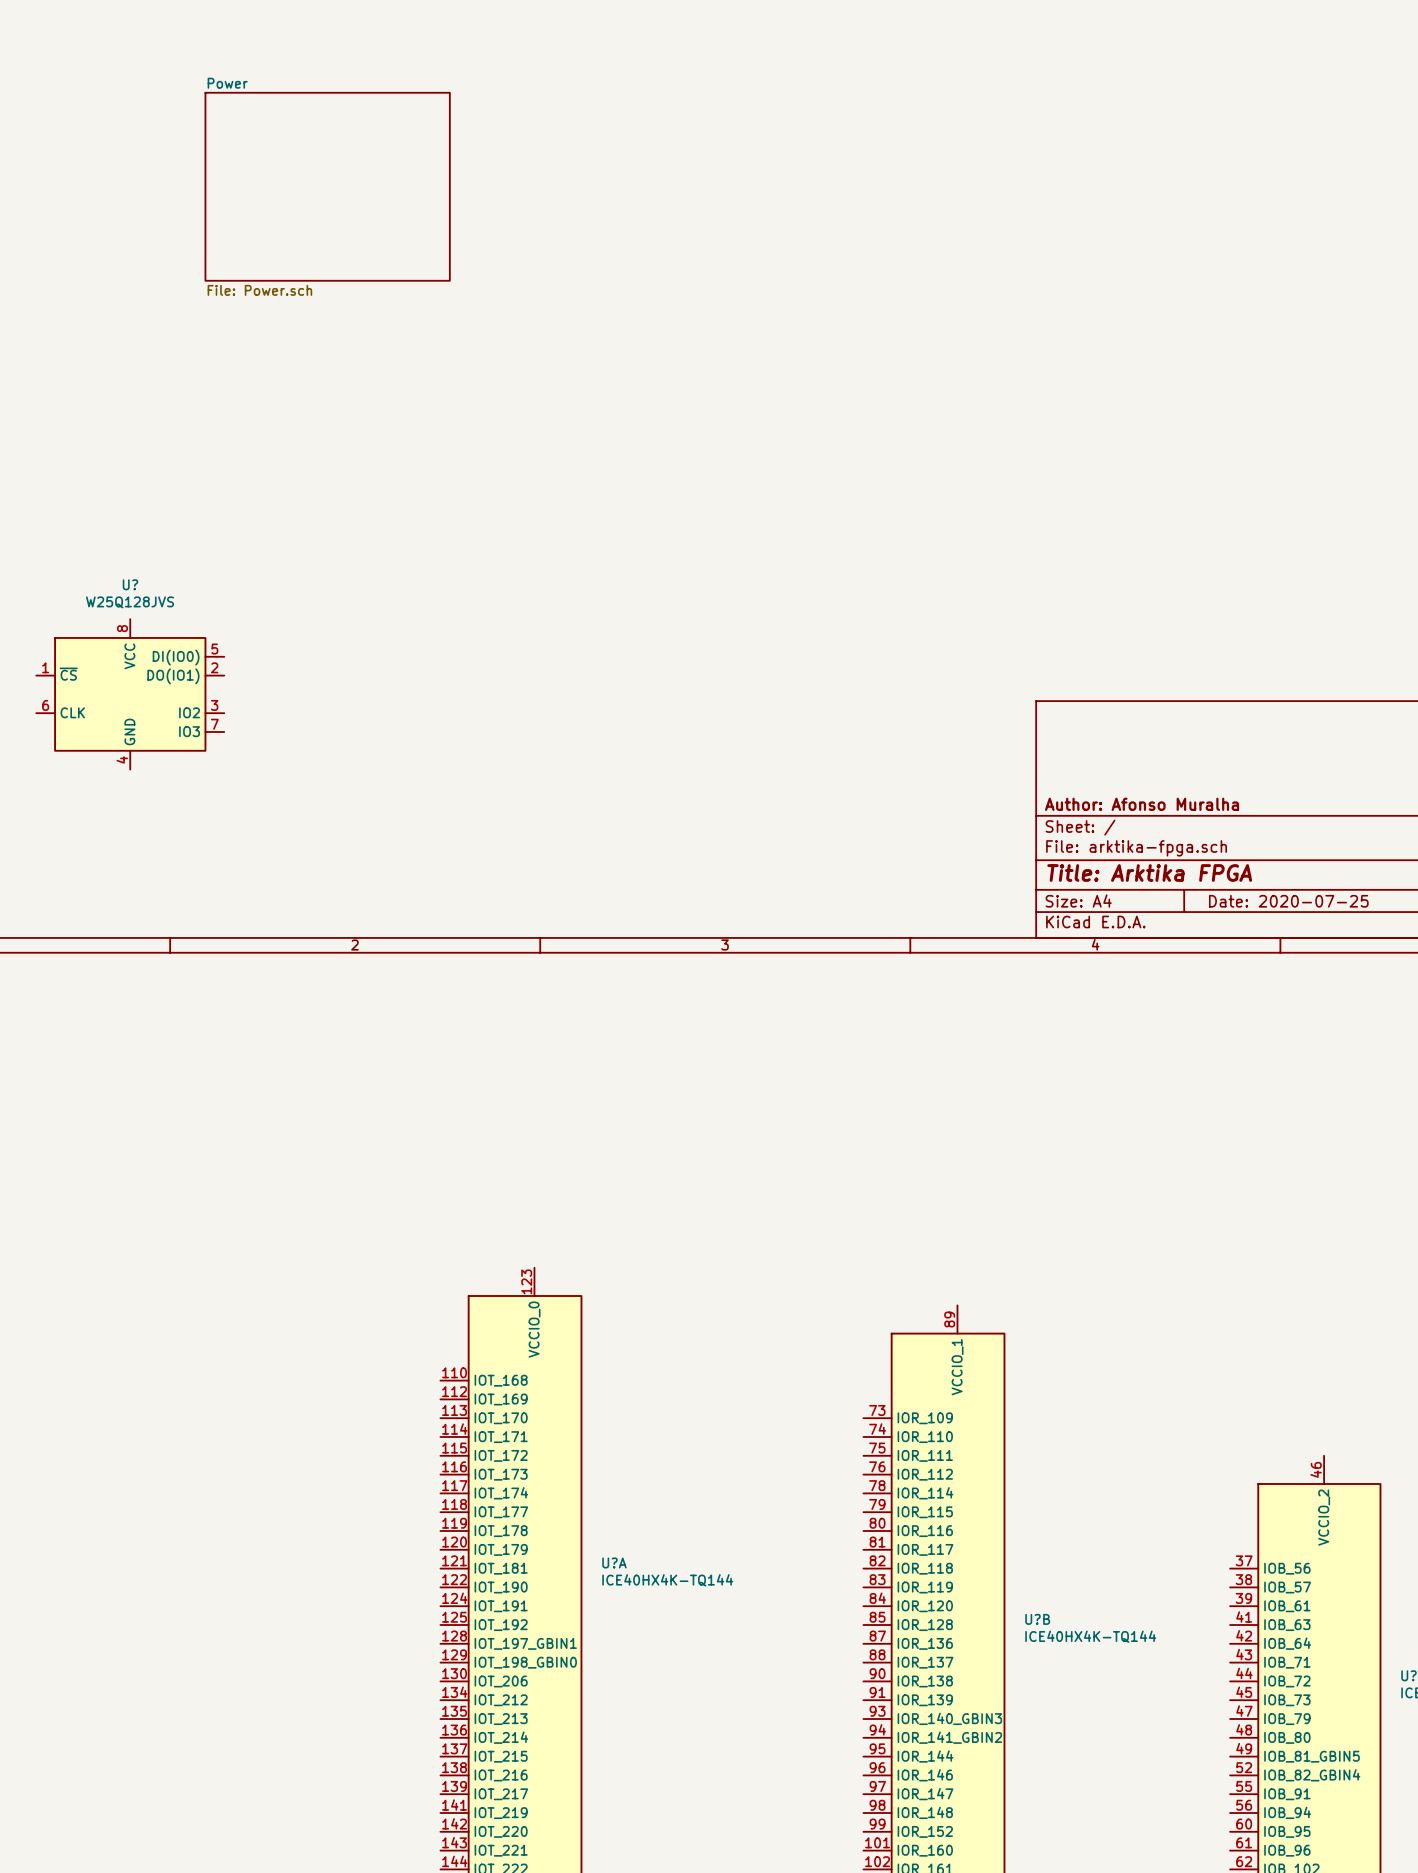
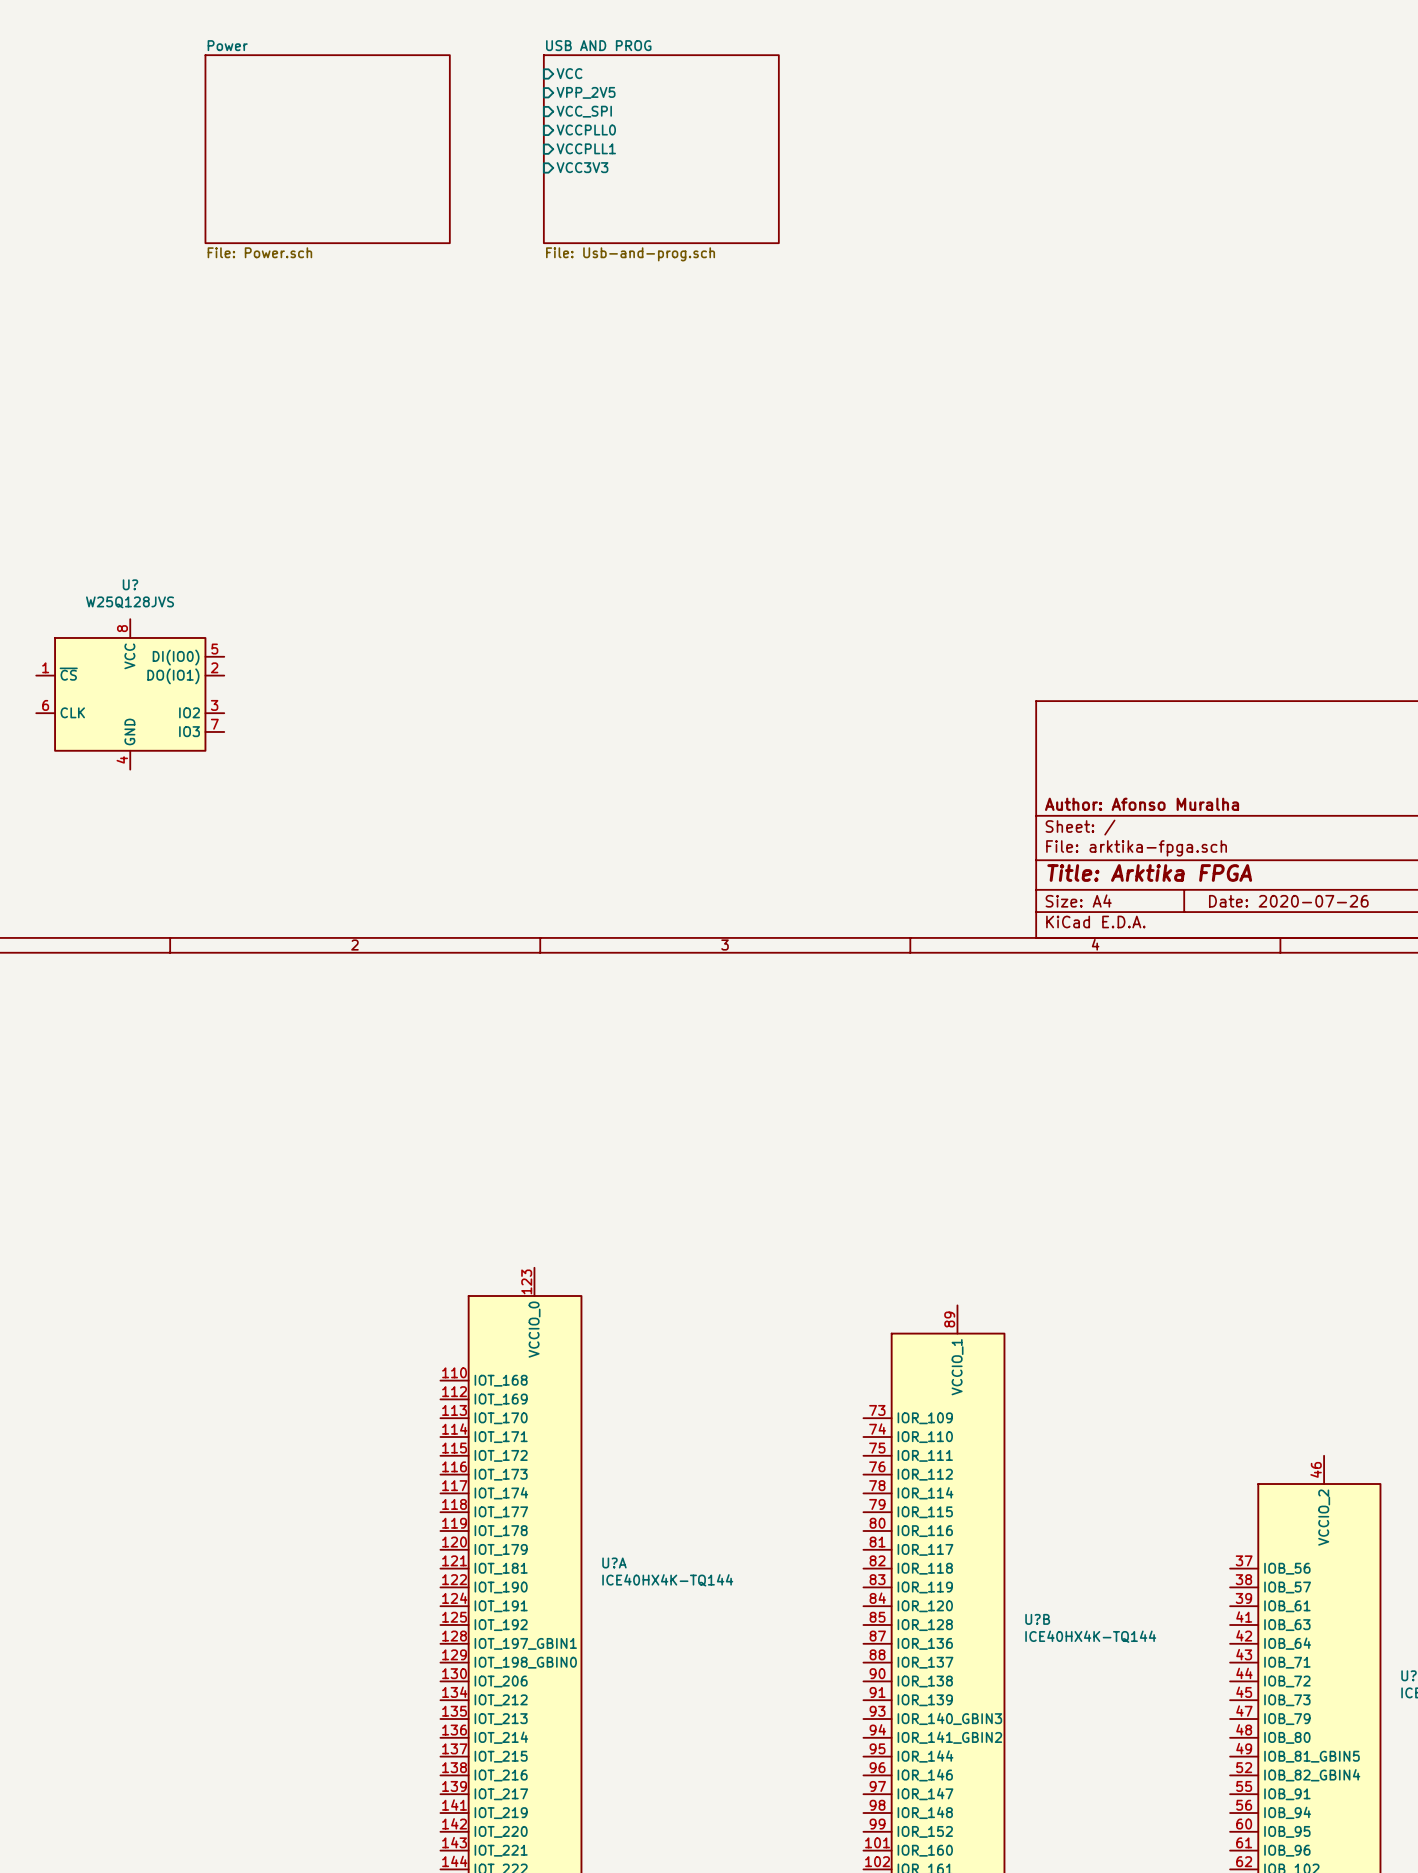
sheet pin: none -> VCC (569, 73)
sheet pin: none -> VPP_2V5 (586, 92)
sheet pin: none -> VCC_SPI (584, 111)
sheet pin: none -> VCCPLL0 (586, 130)
sheet pin: none -> VCCPLL1 (586, 148)
sheet USB AND PROG: none -> File: Usb-and-prog.sch (661, 149)
sheet pin: none -> VCC3V3 (582, 167)
sheet Power position: (327, 186) -> (327, 149)
title block: Date: 2020-07-25 (1288, 901) -> Date: 2020-07-26 (1288, 901)

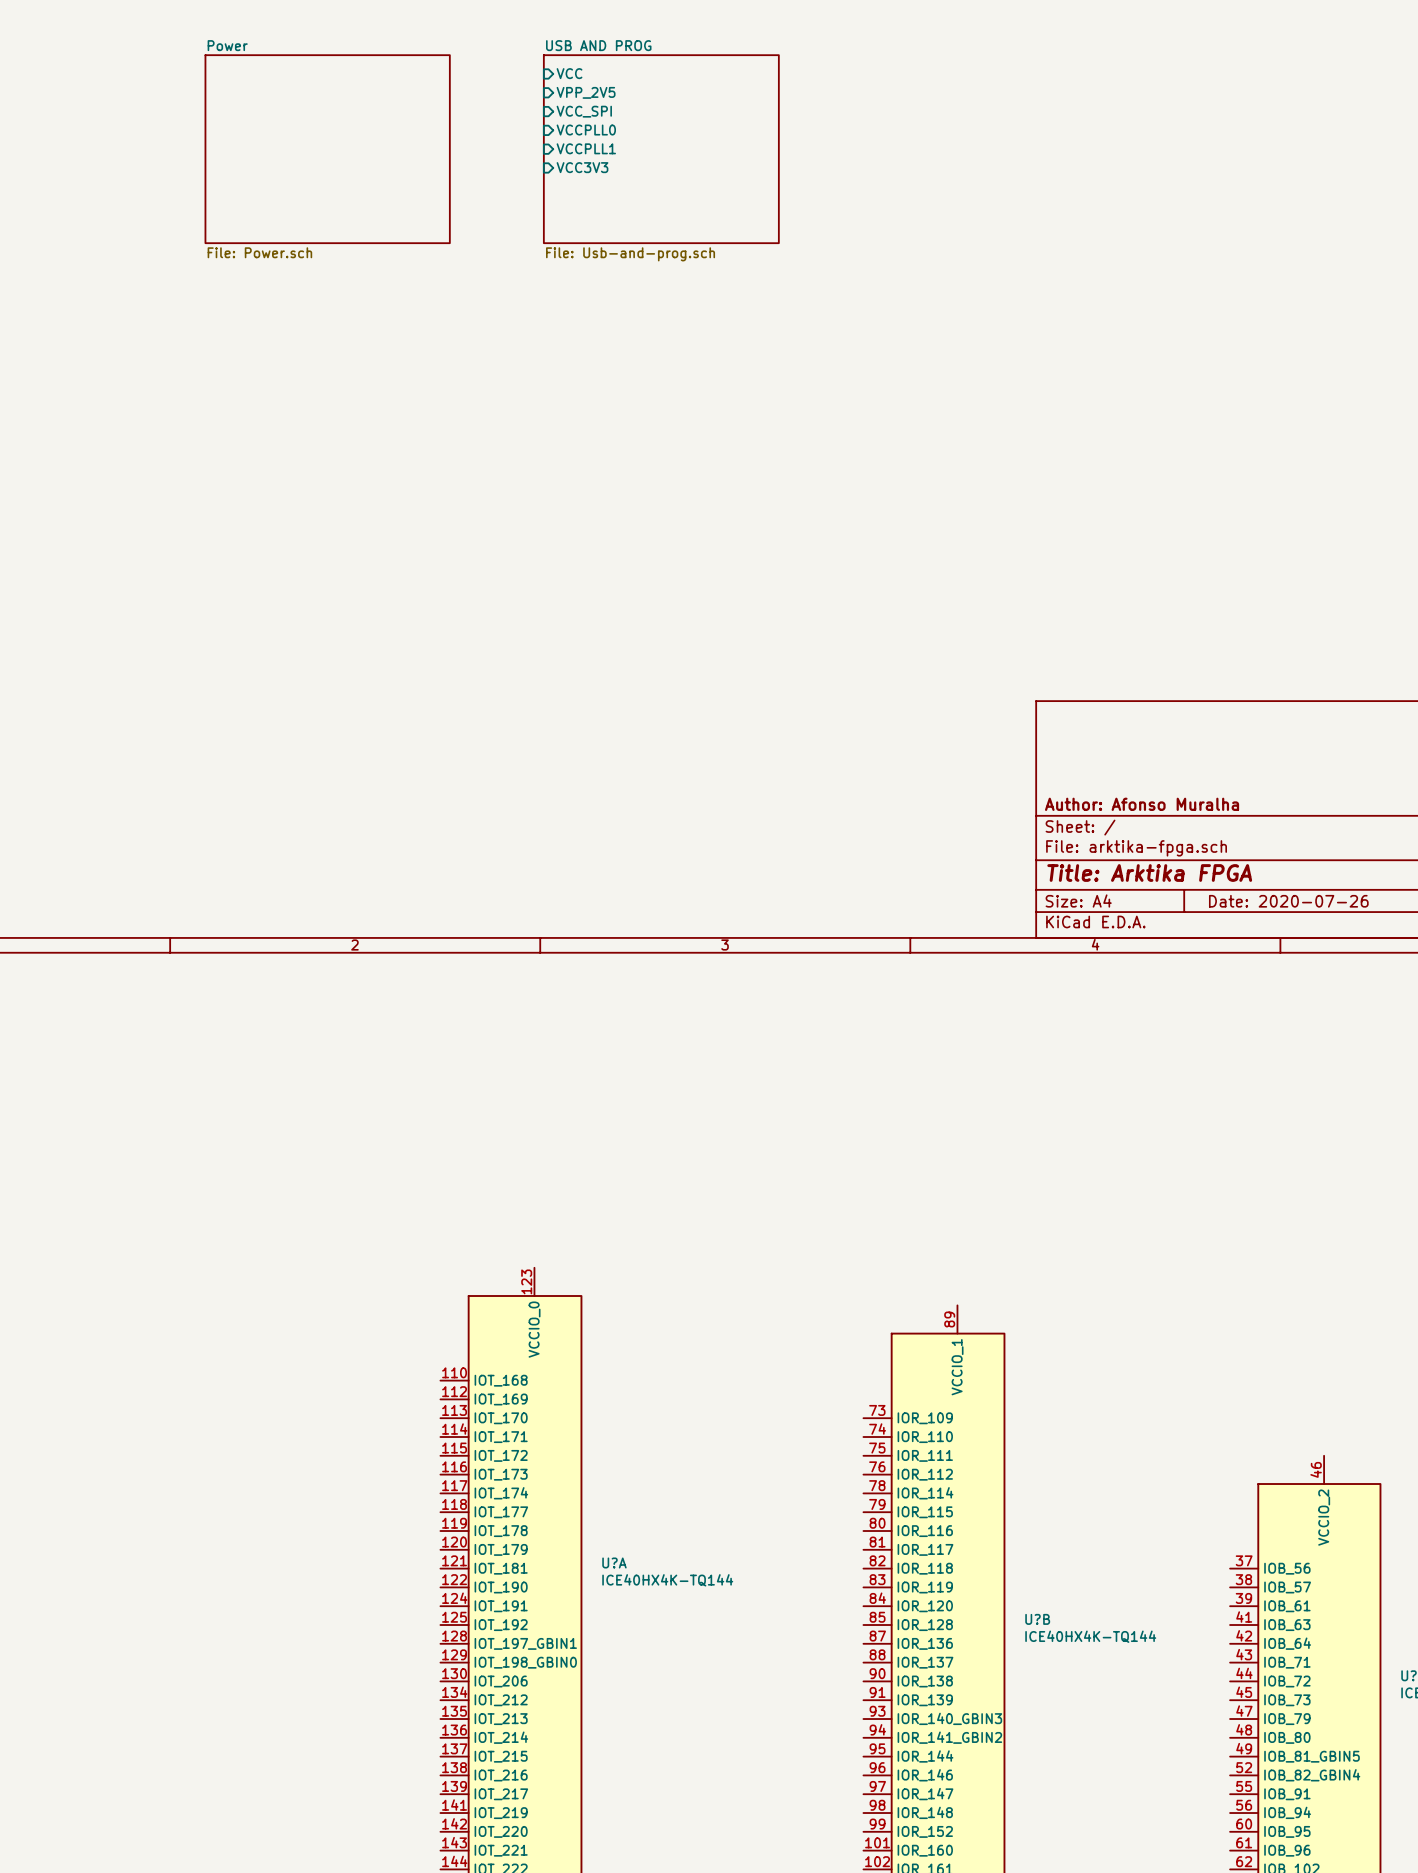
U?: W25Q128JVS (130, 694) -> none

